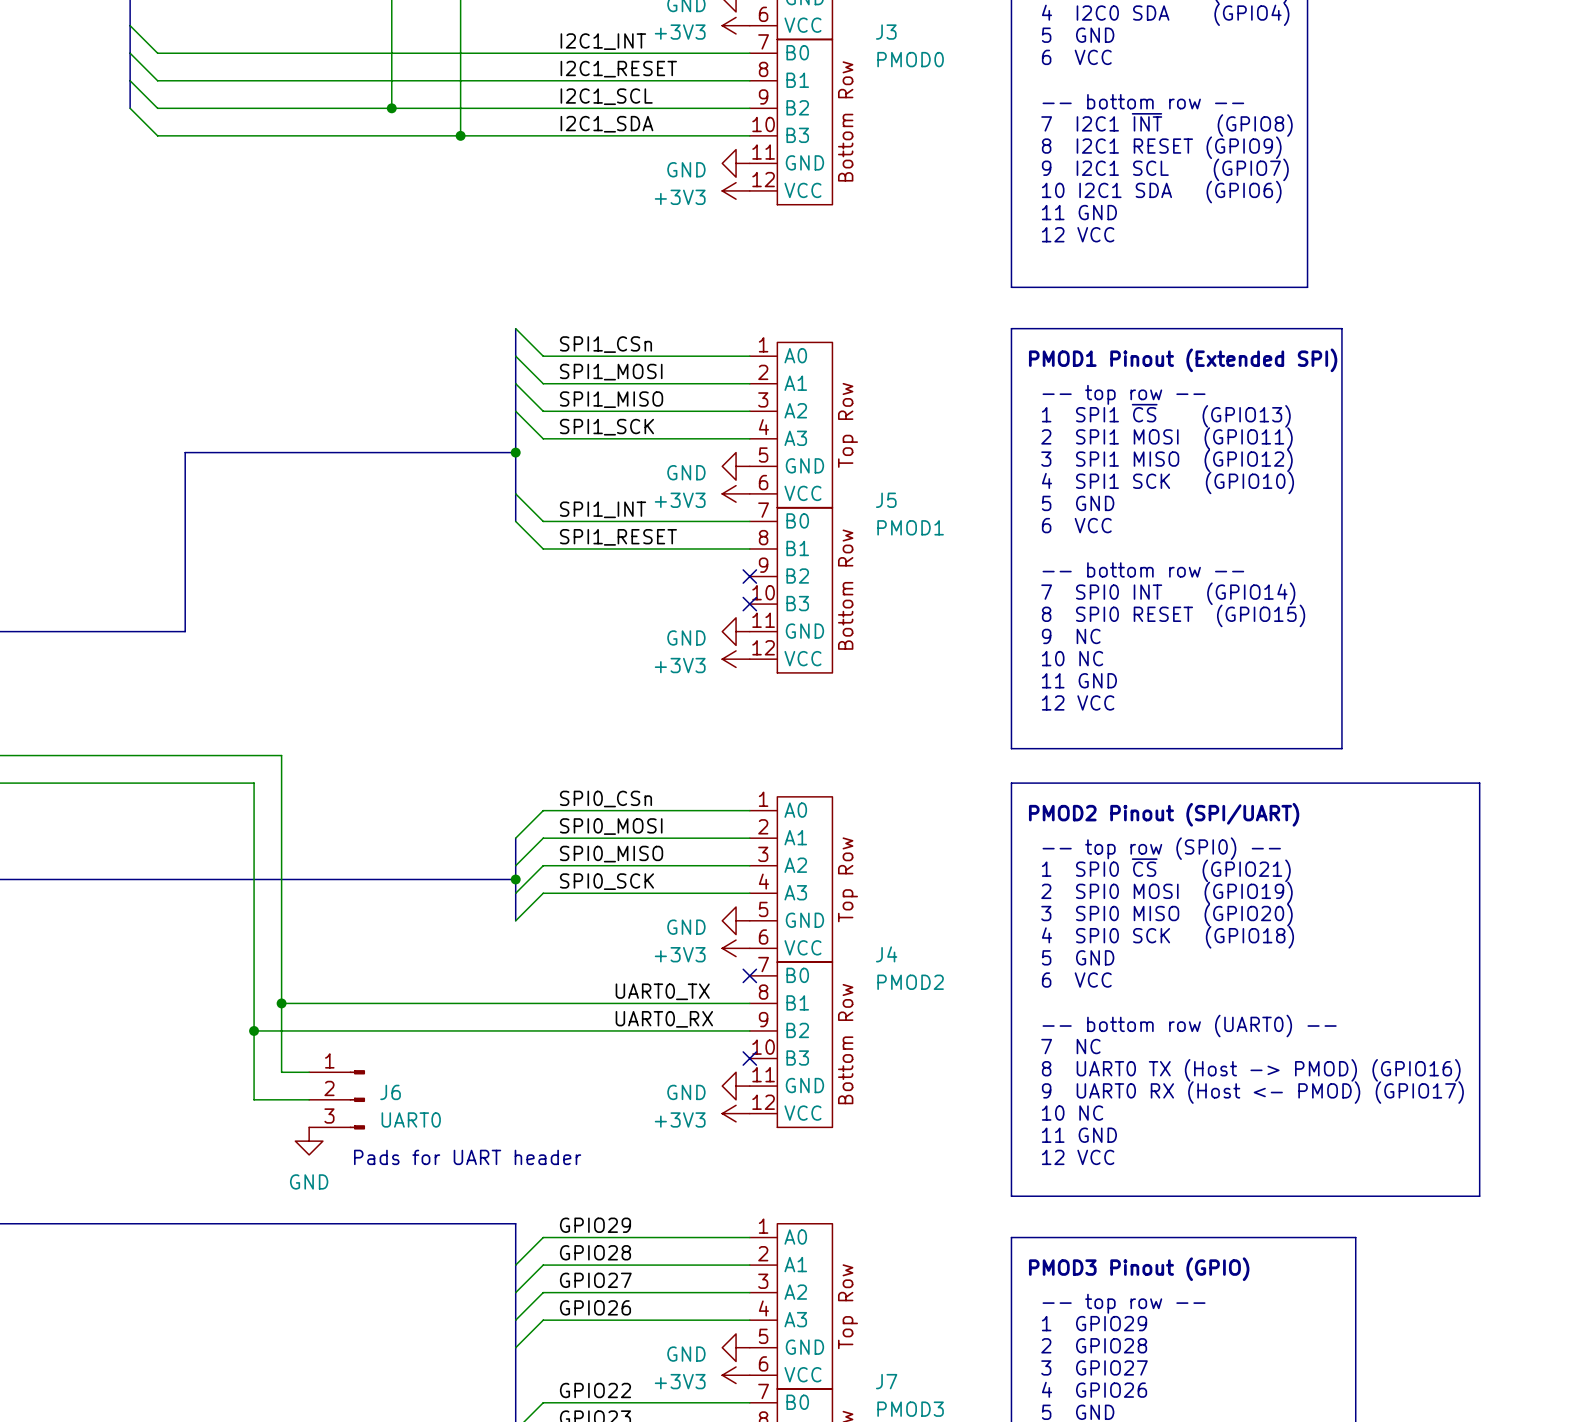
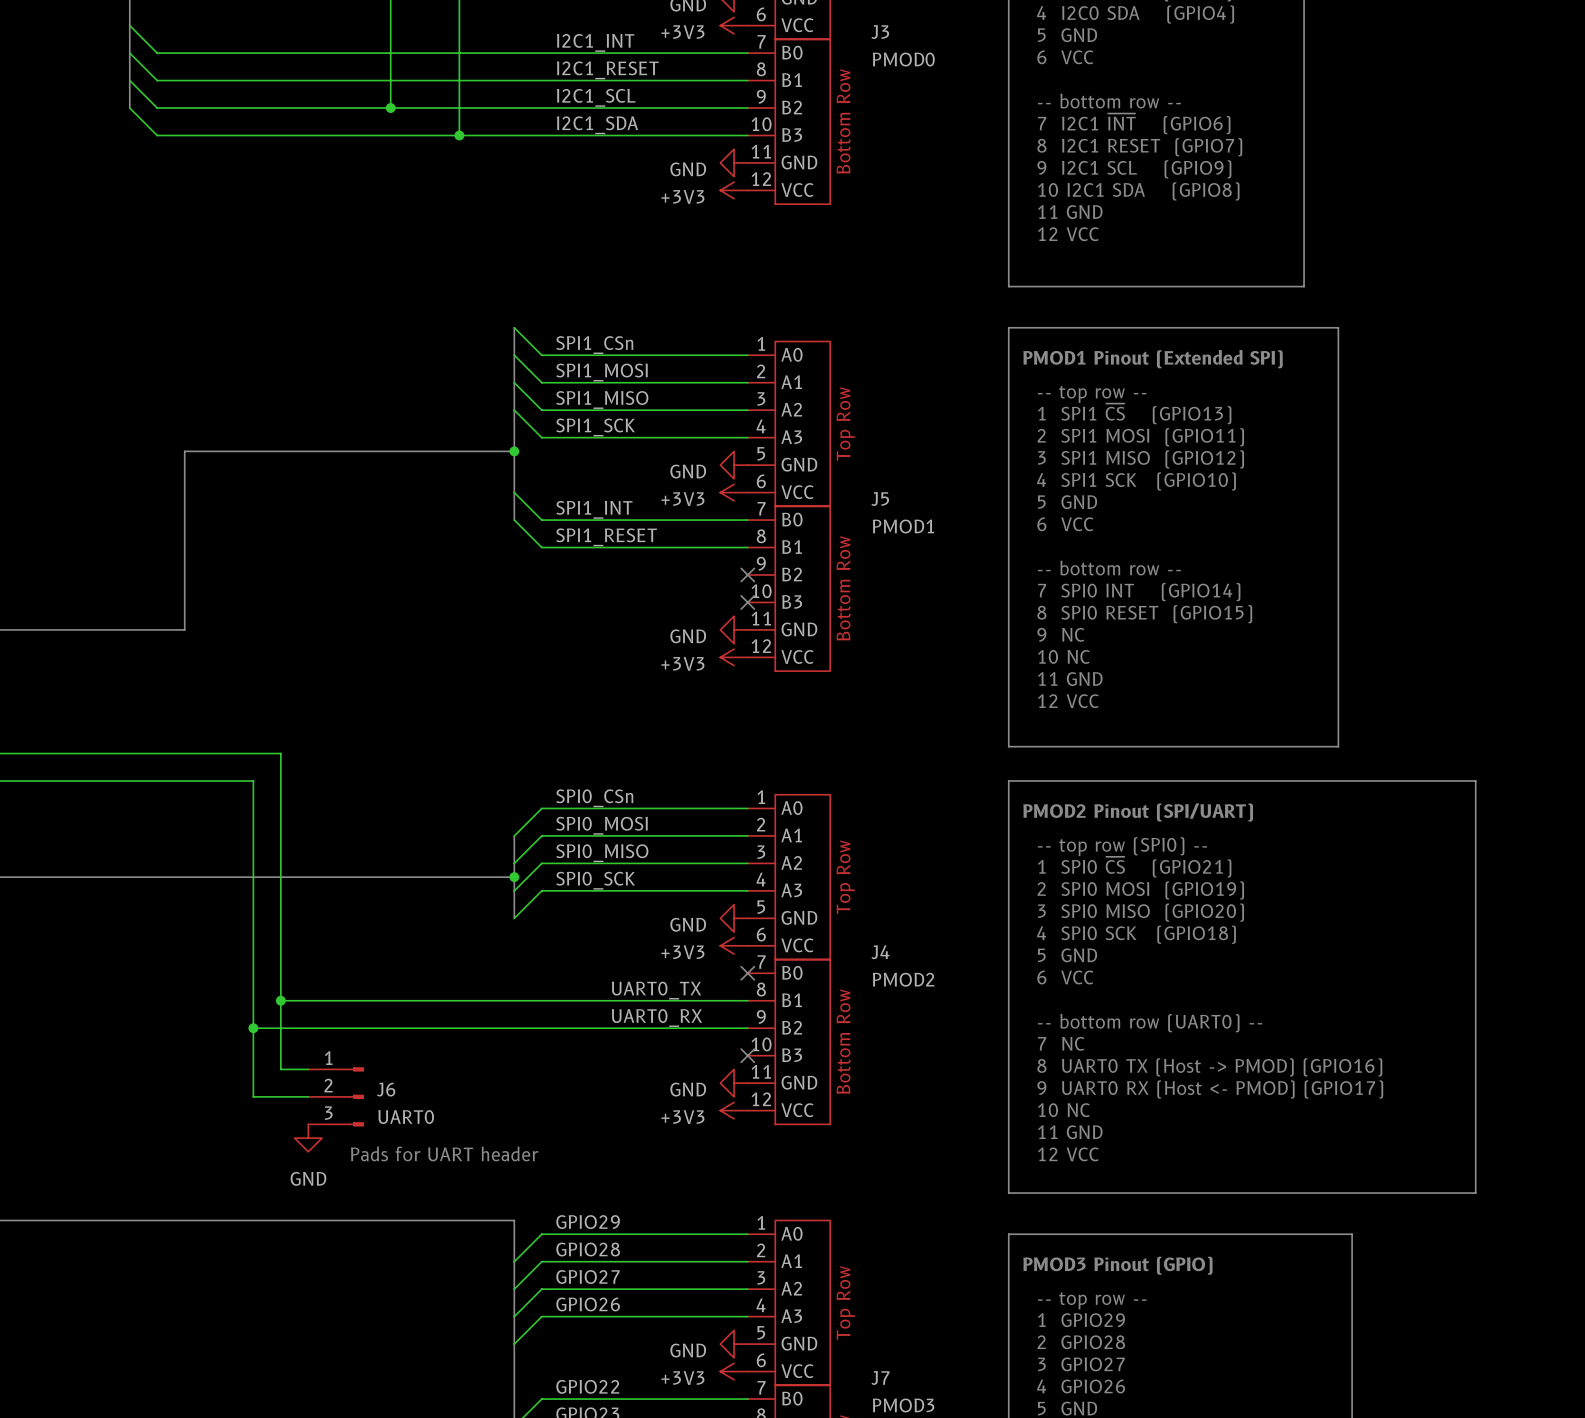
text: 7 I2C1 ~{INT} (GPIO8) (1166, 124) -> 7 I2C1 ~{INT} (GPIO6) (1134, 123)
text: 8 I2C1 RESET (GPIO9) (1161, 147) -> 8 I2C1 RESET (GPIO7) (1139, 147)
text: 9 I2C1 SCL (GPIO7) (1165, 169) -> 9 I2C1 SCL (GPIO9) (1134, 169)
text: 10 I2C1 SDA (GPIO6) (1161, 192) -> 10 I2C1 SDA (GPIO8) (1138, 191)

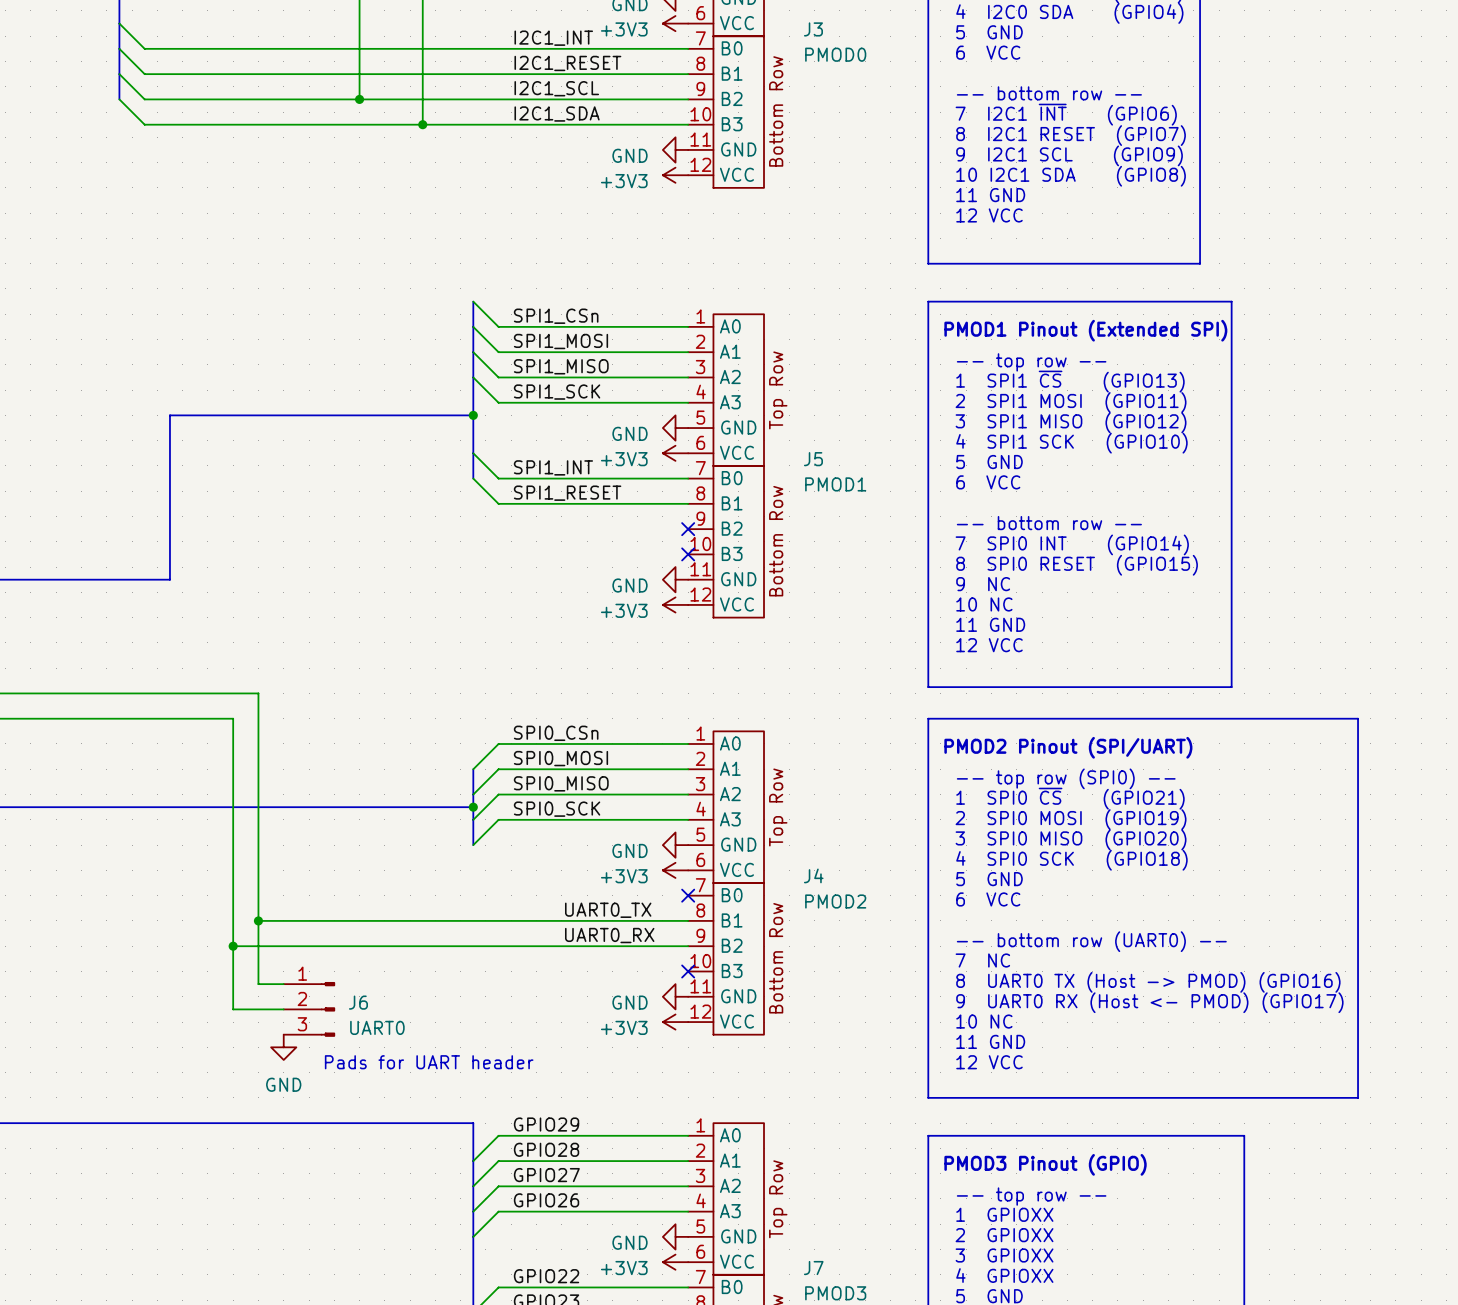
text: 1 GPIO29 (1081, 1320) -> 1 GPIOXX (1004, 1214)
text: 2 GPIO28 (1081, 1342) -> 2 GPIOXX (1004, 1235)
text: 3 GPIO27 (1081, 1364) -> 3 GPIOXX (1004, 1255)
text: 4 GPIO26 (1081, 1386) -> 4 GPIOXX (1004, 1275)

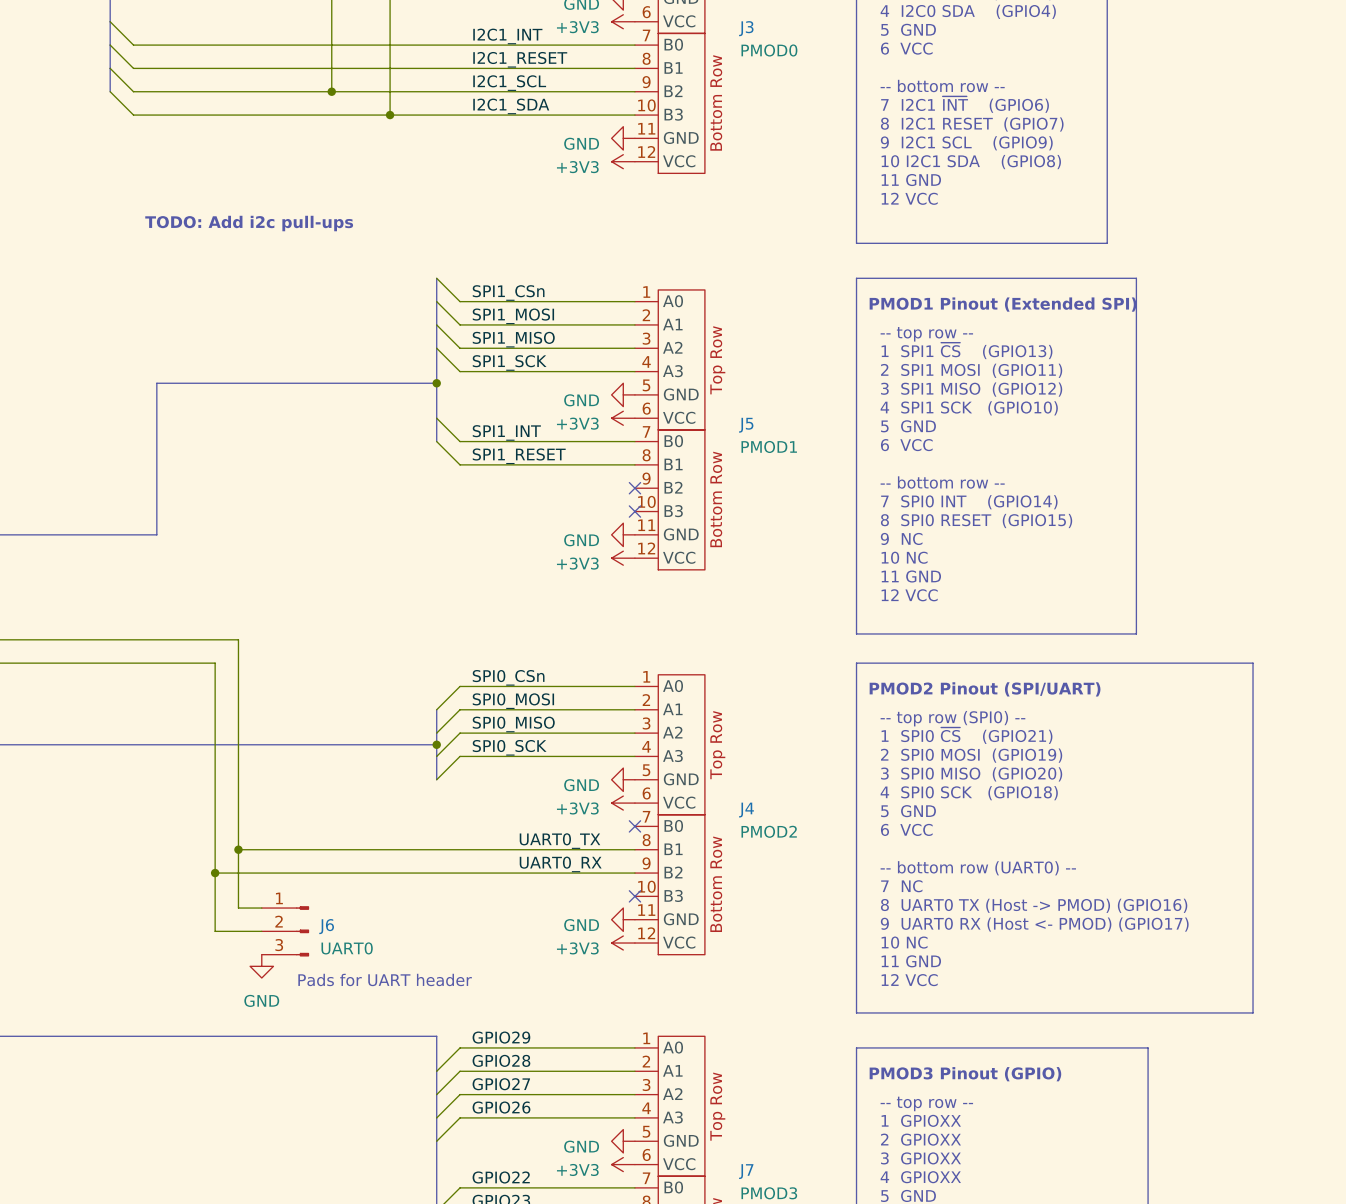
text: none -> TODO: Add i2c pull-ups (249, 223)

